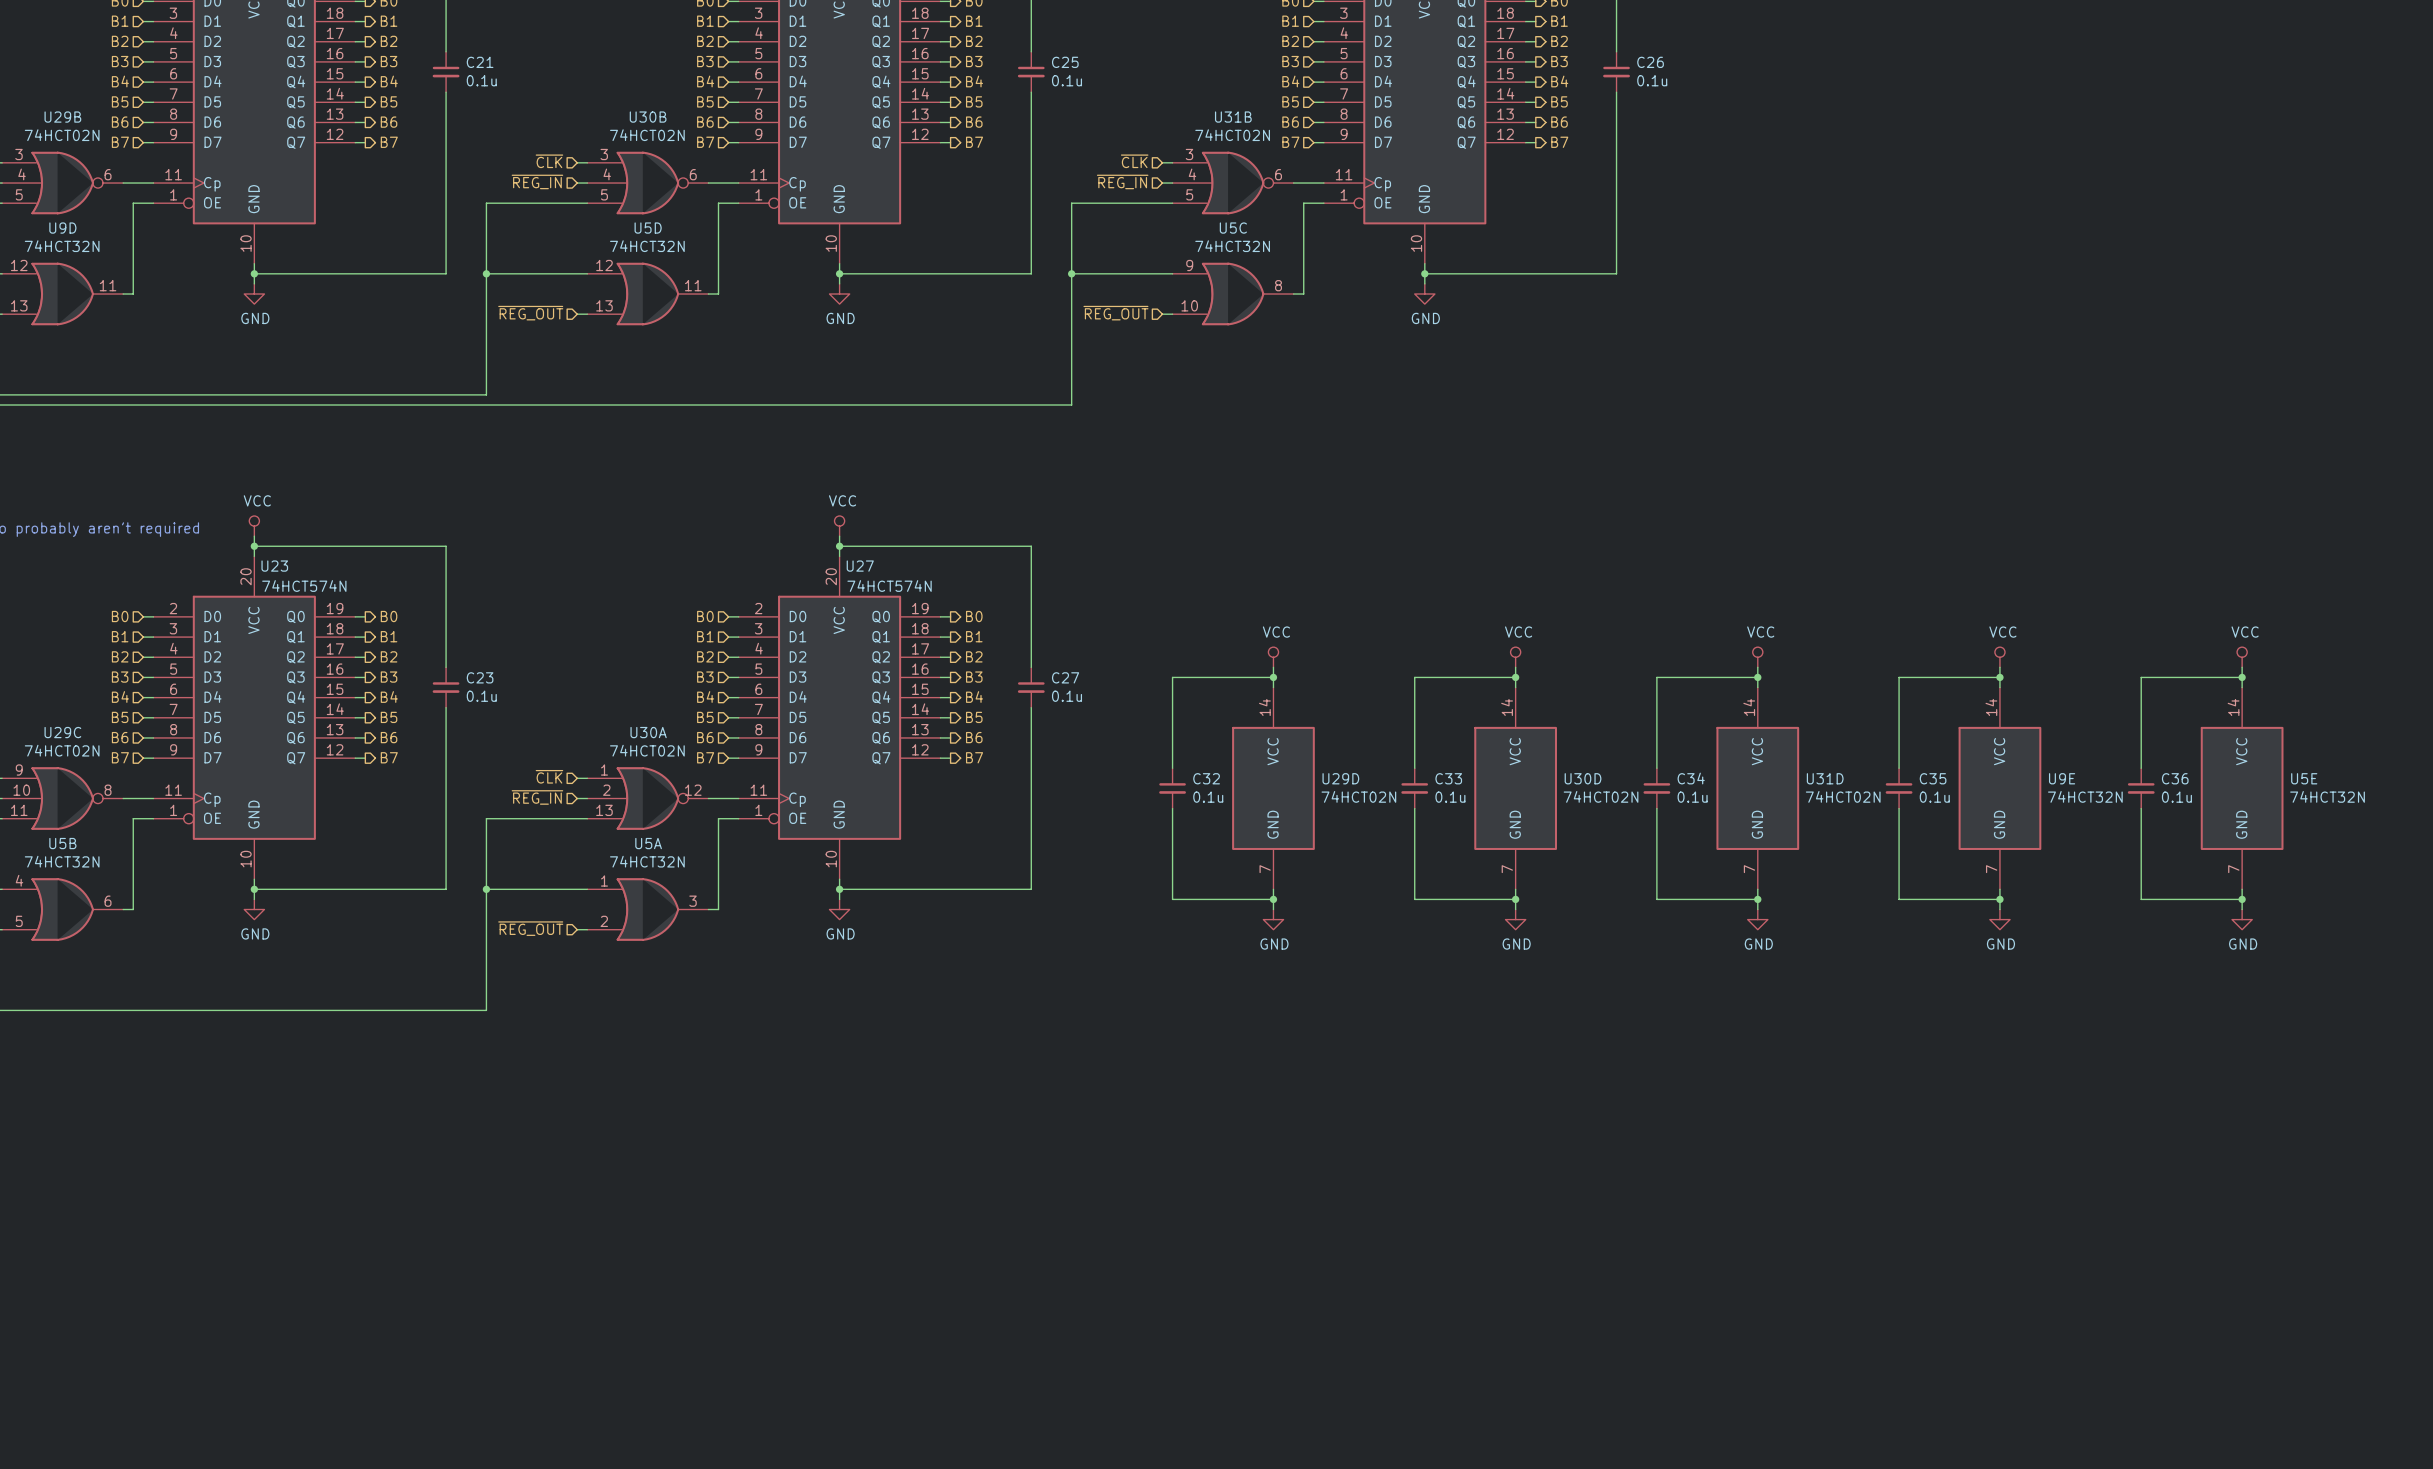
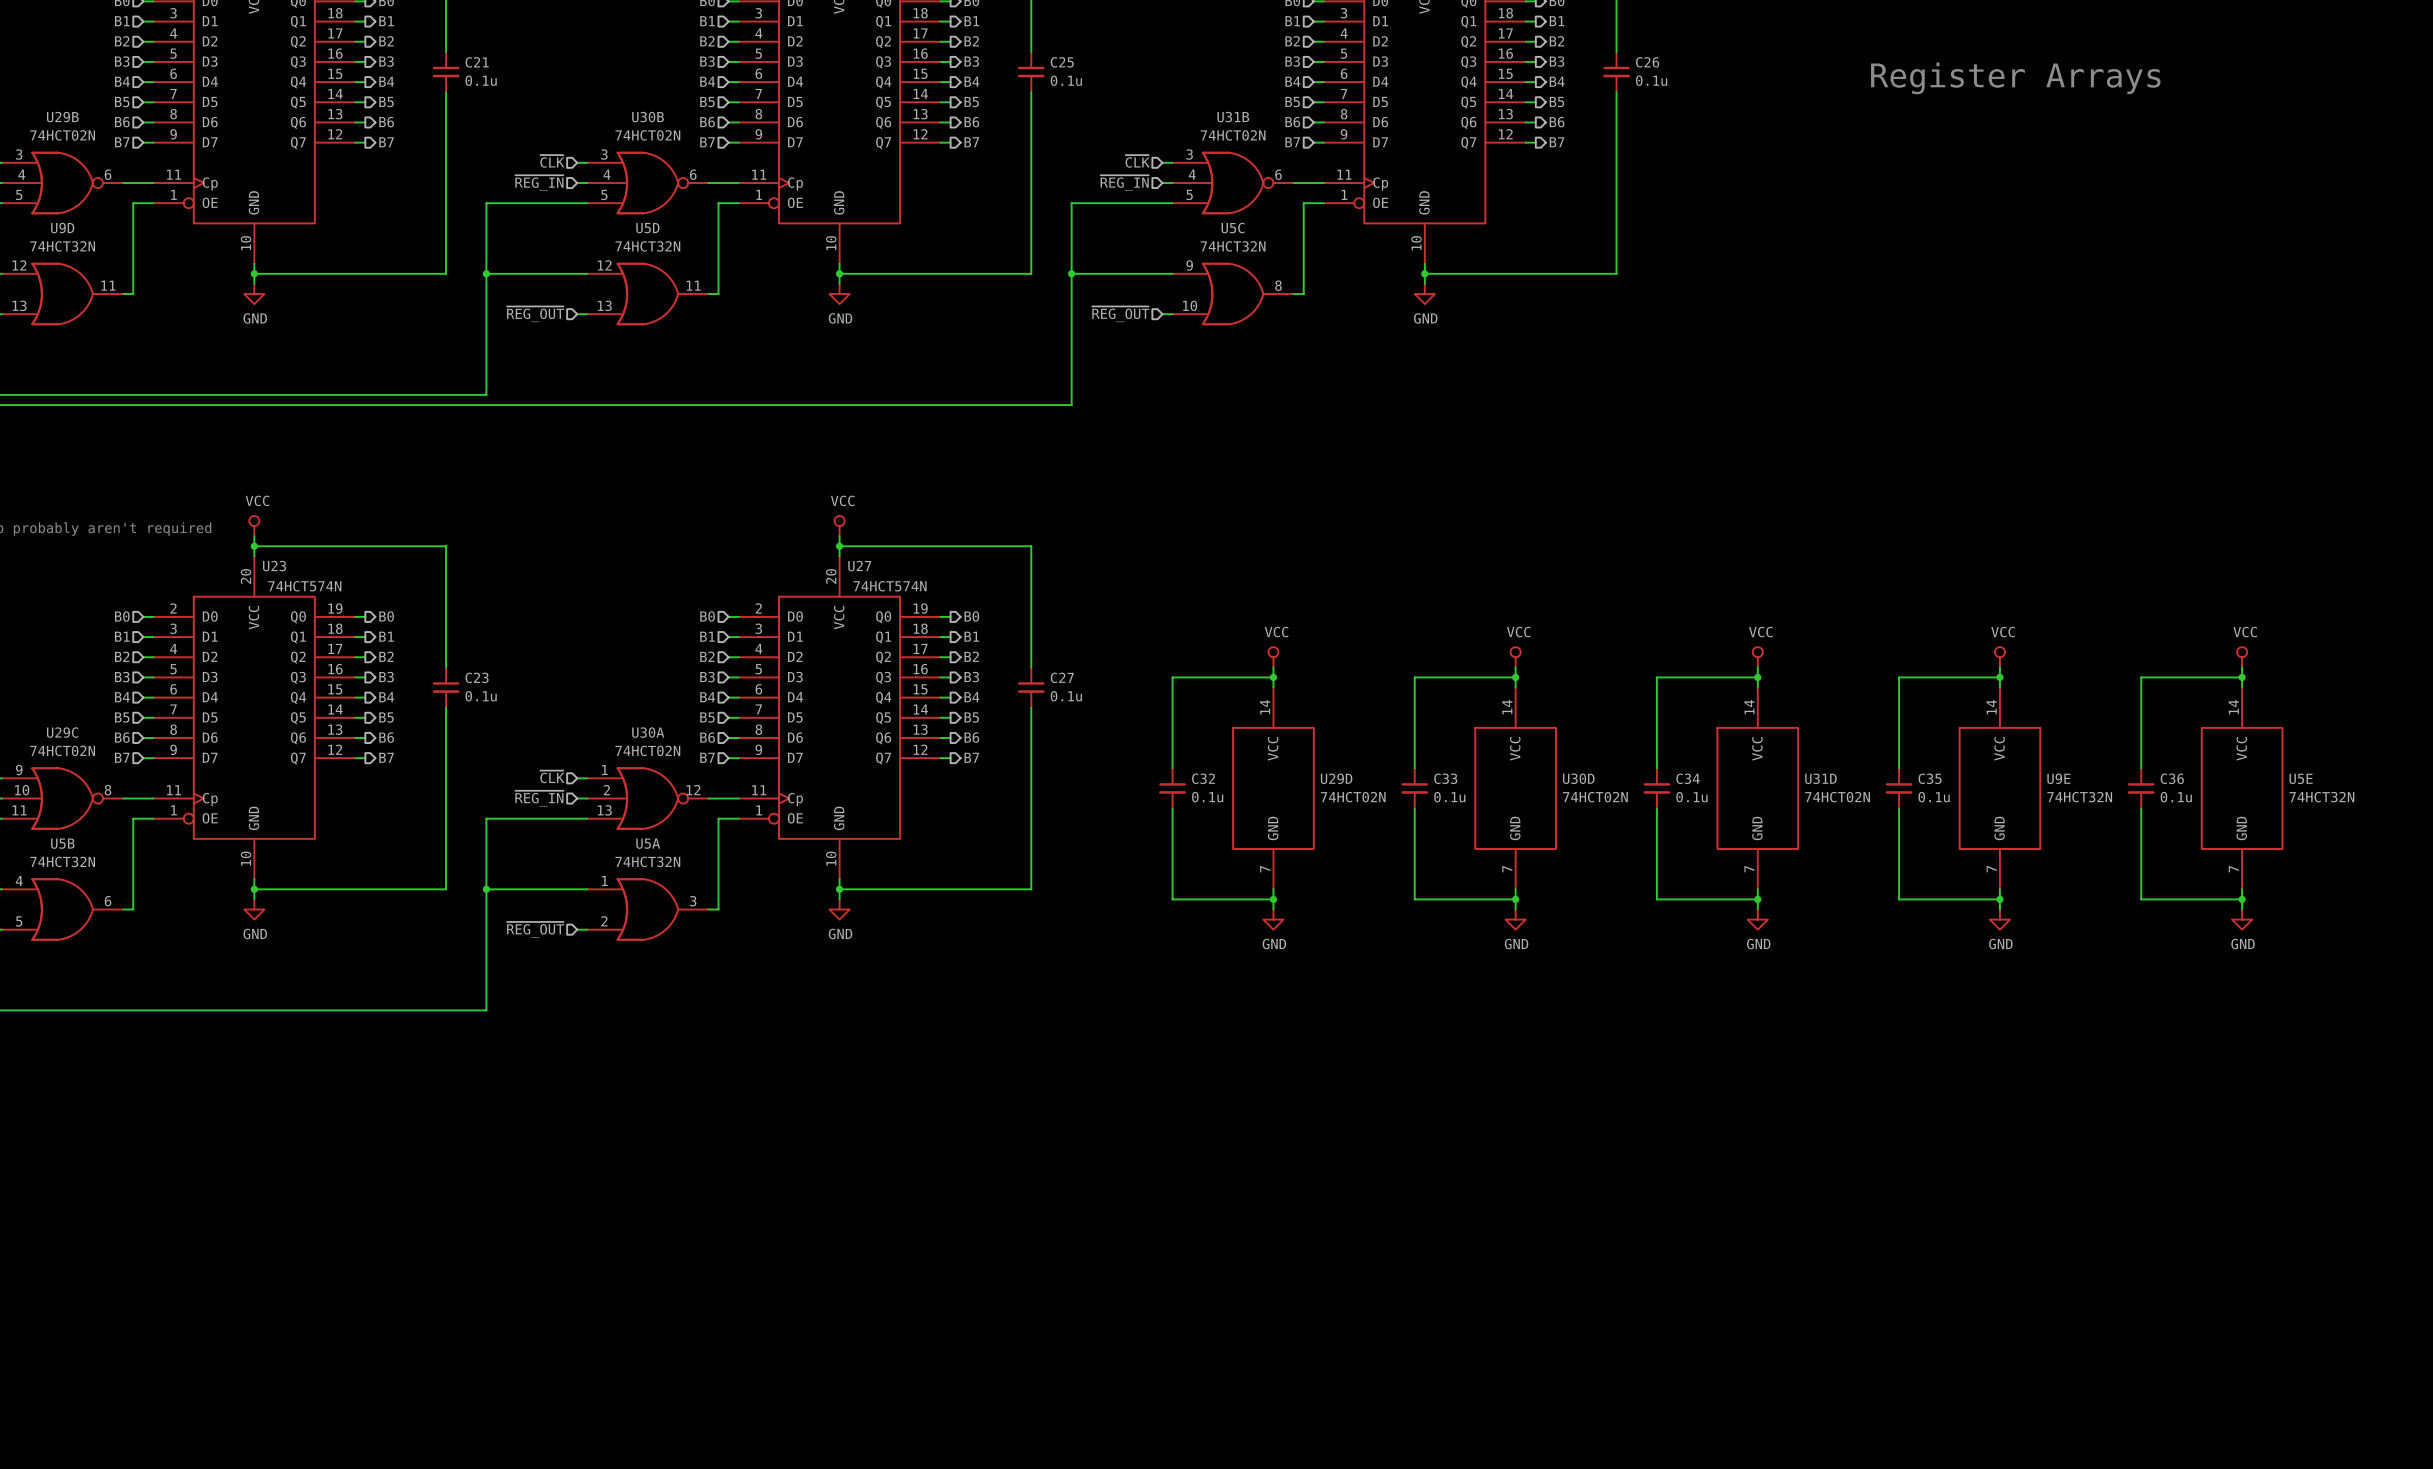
text: none -> Register Arrays (2015, 78)

